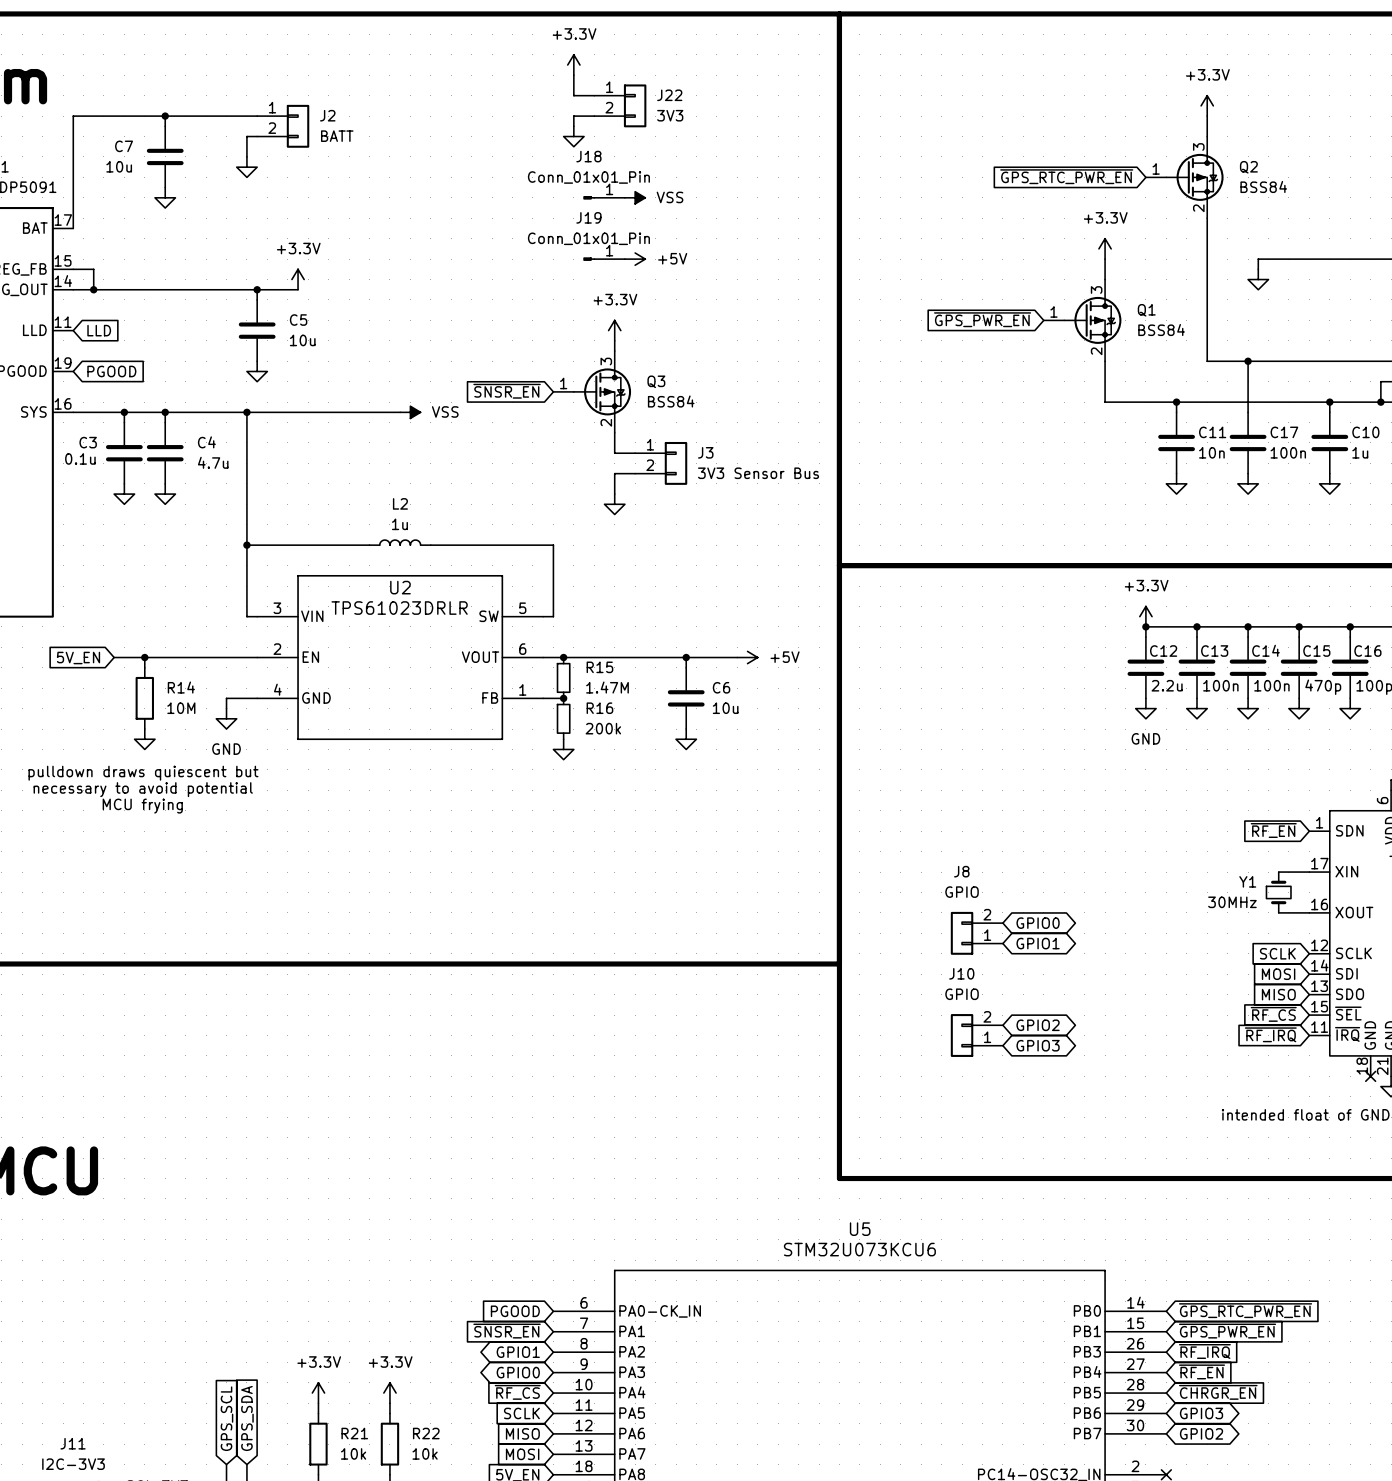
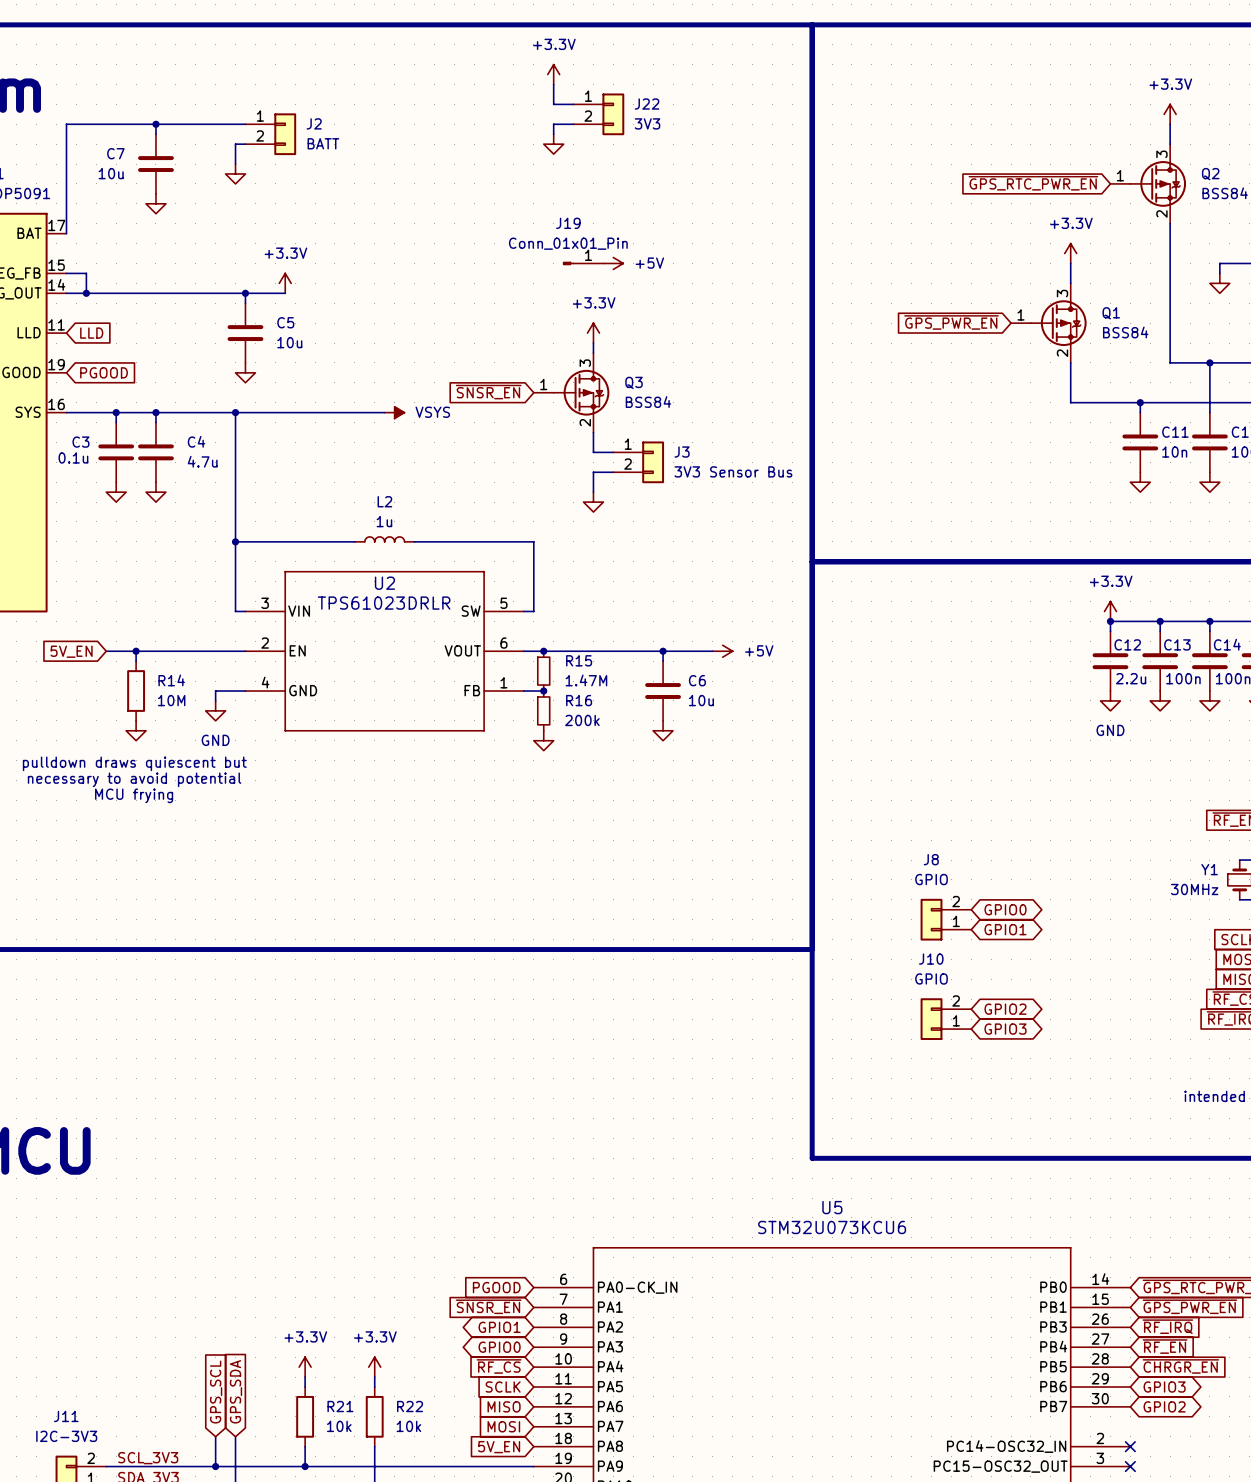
J18: Conn_01x01_Pin (604, 197) -> none
power symbol: VSS (635, 197) -> none
power symbol: VSS (410, 412) -> VSYS (394, 412)

